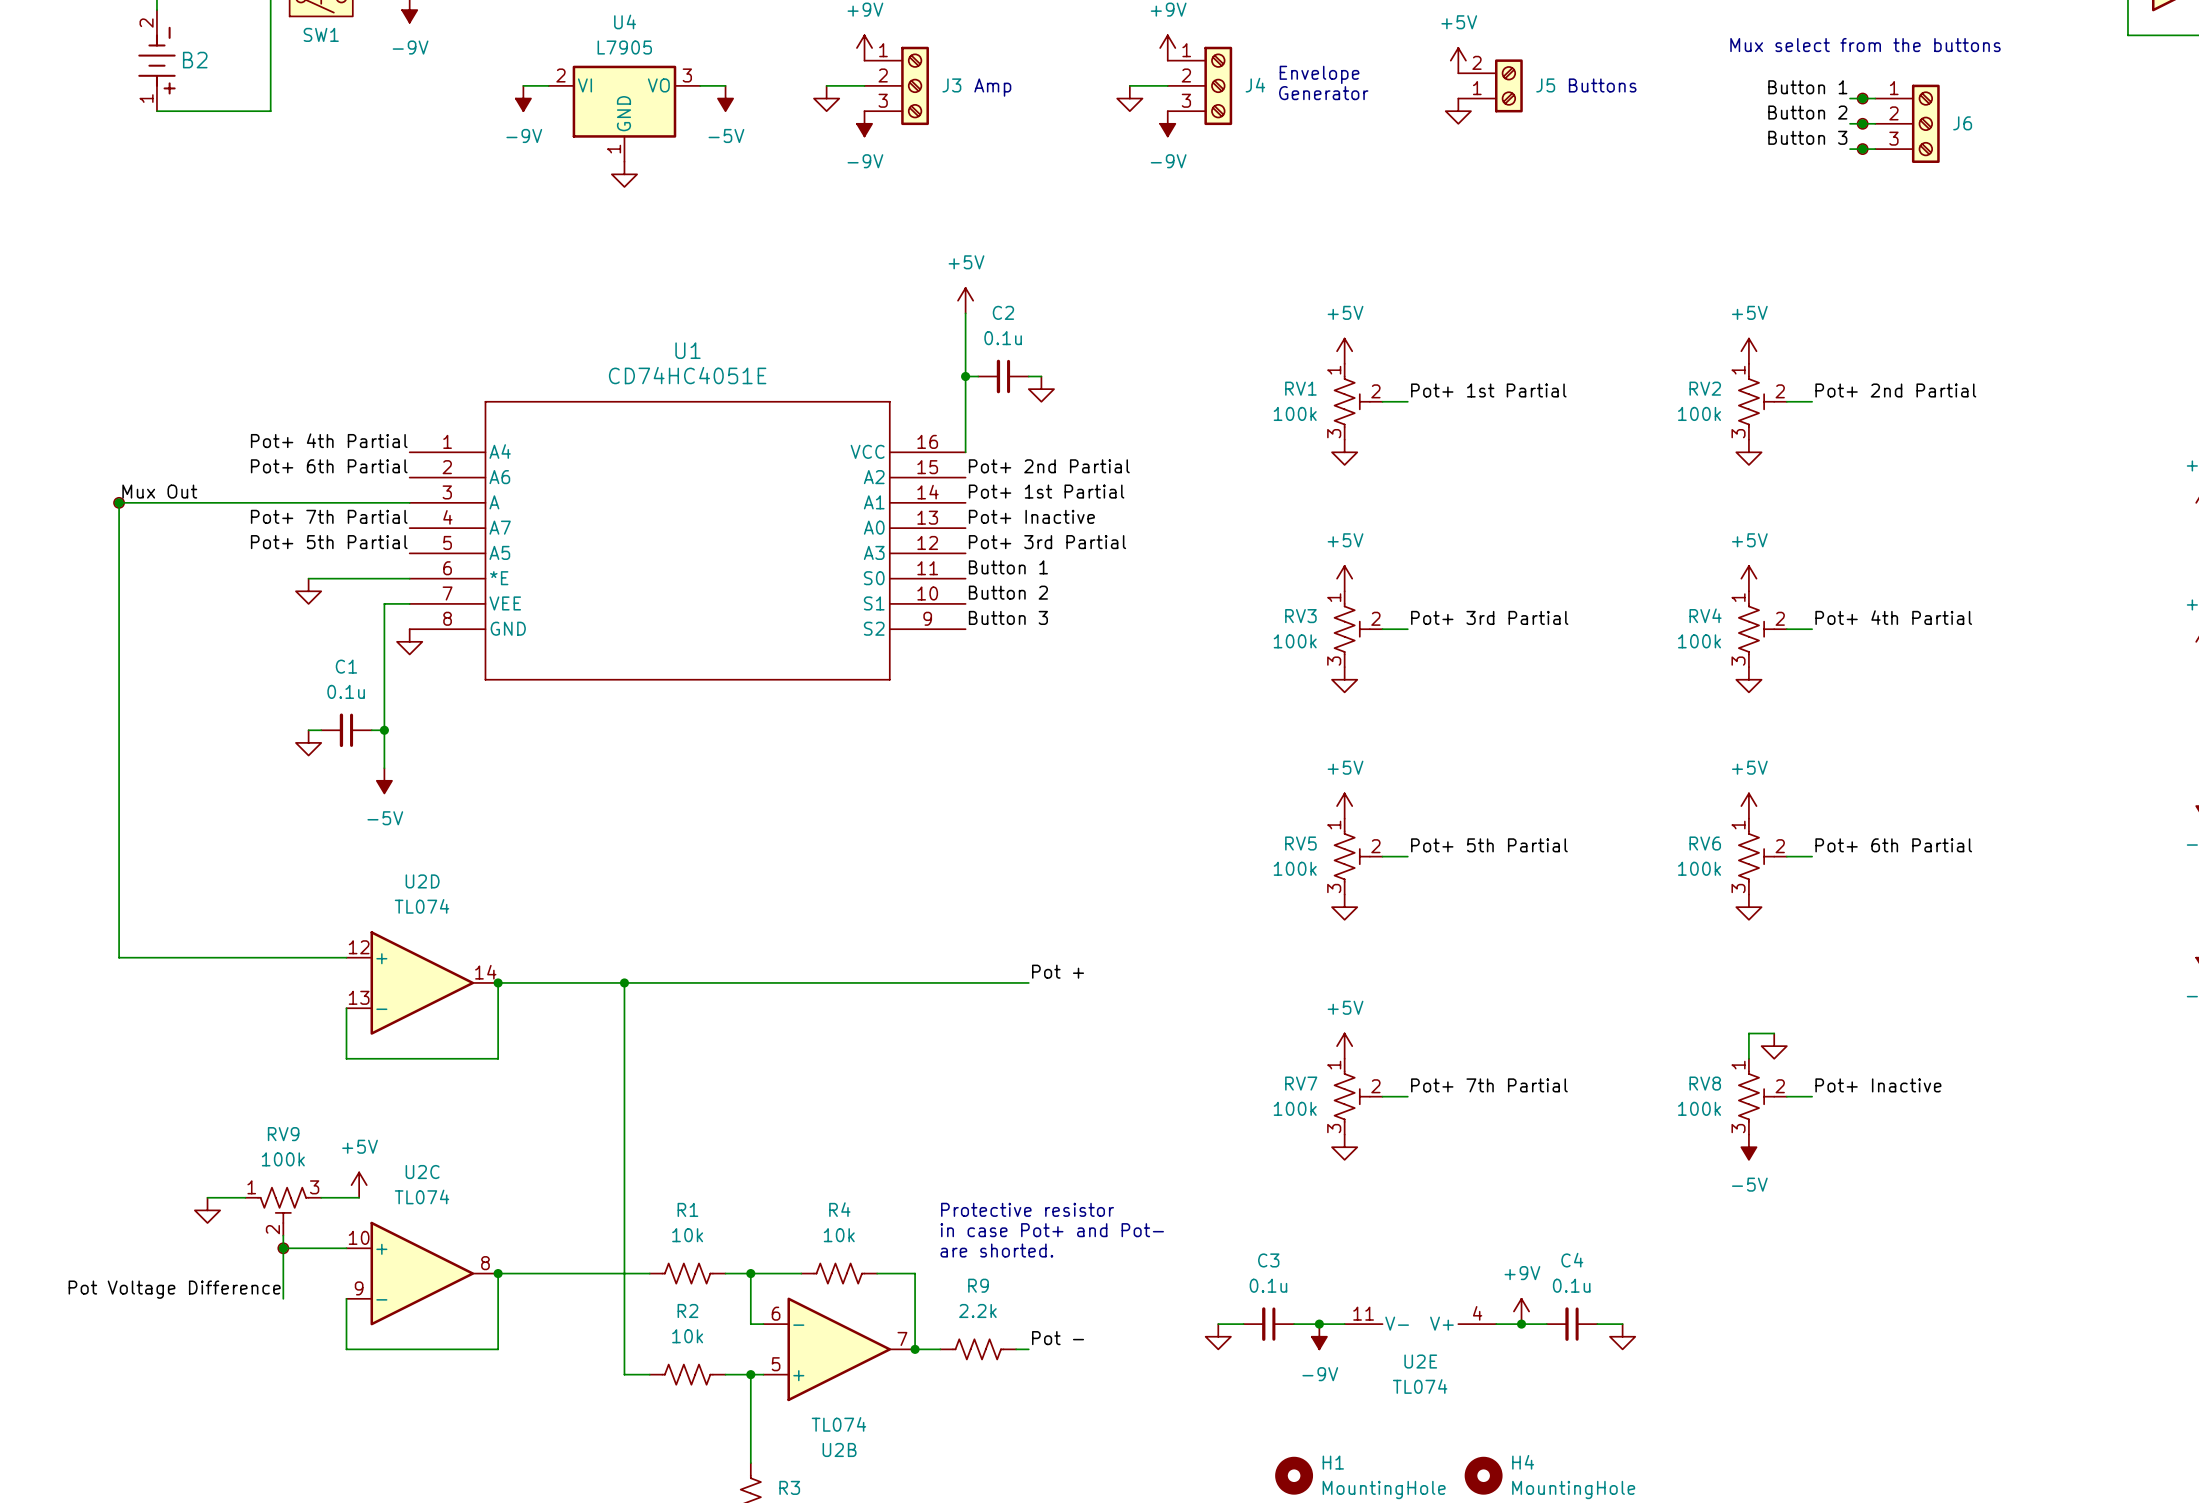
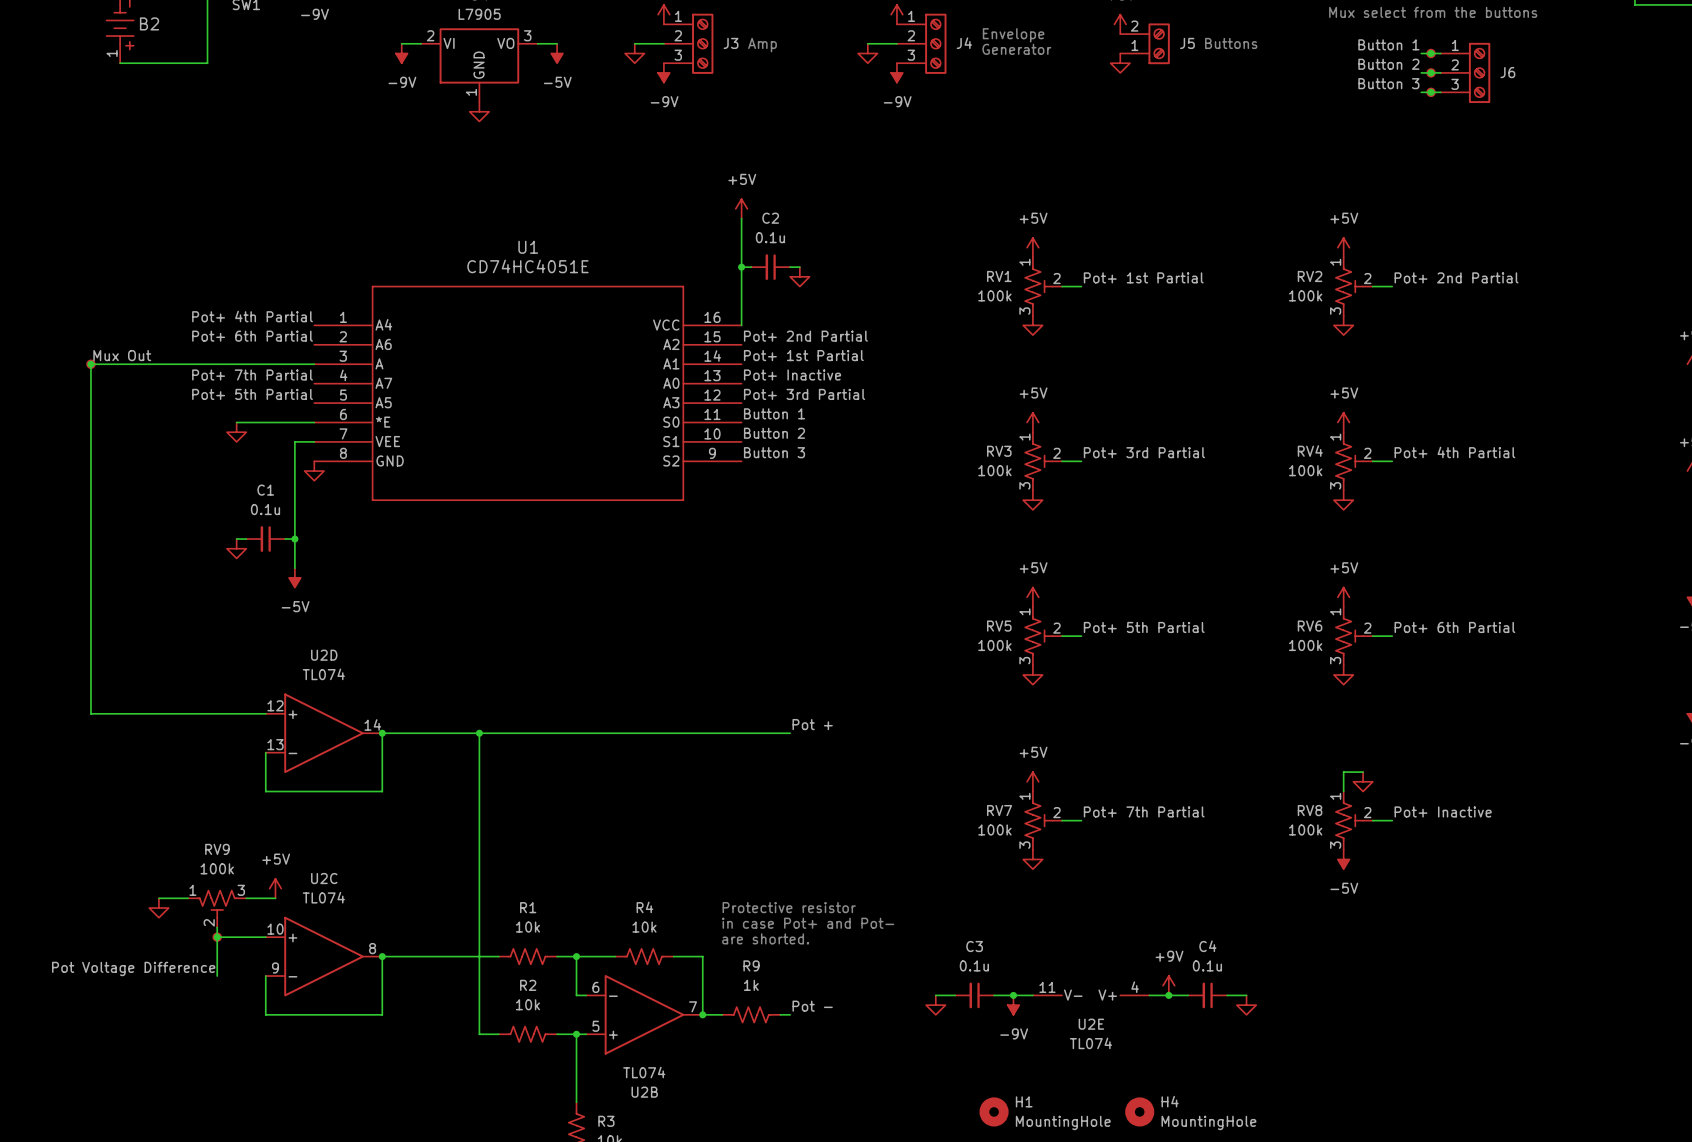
R9 value: 2.2k (977, 1310) -> 1k (751, 985)

